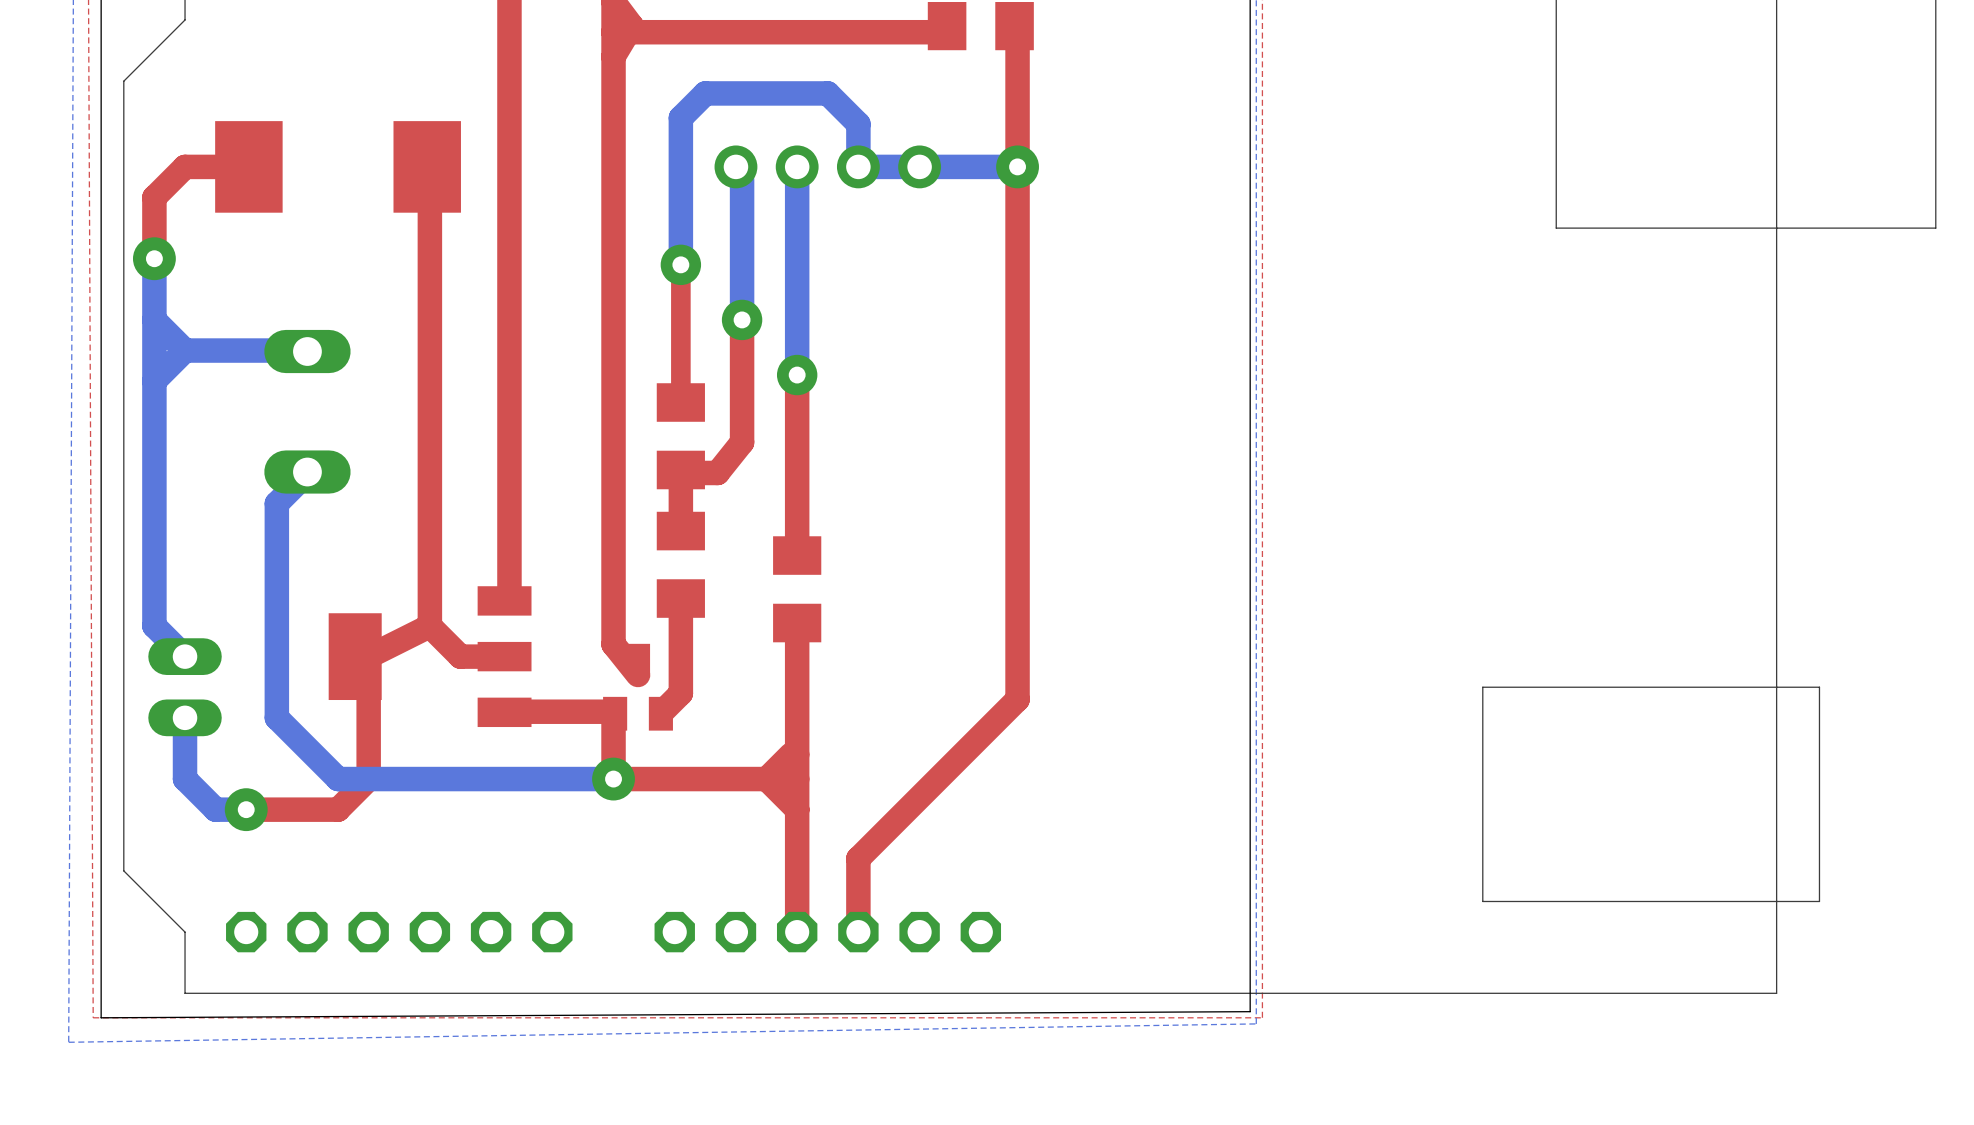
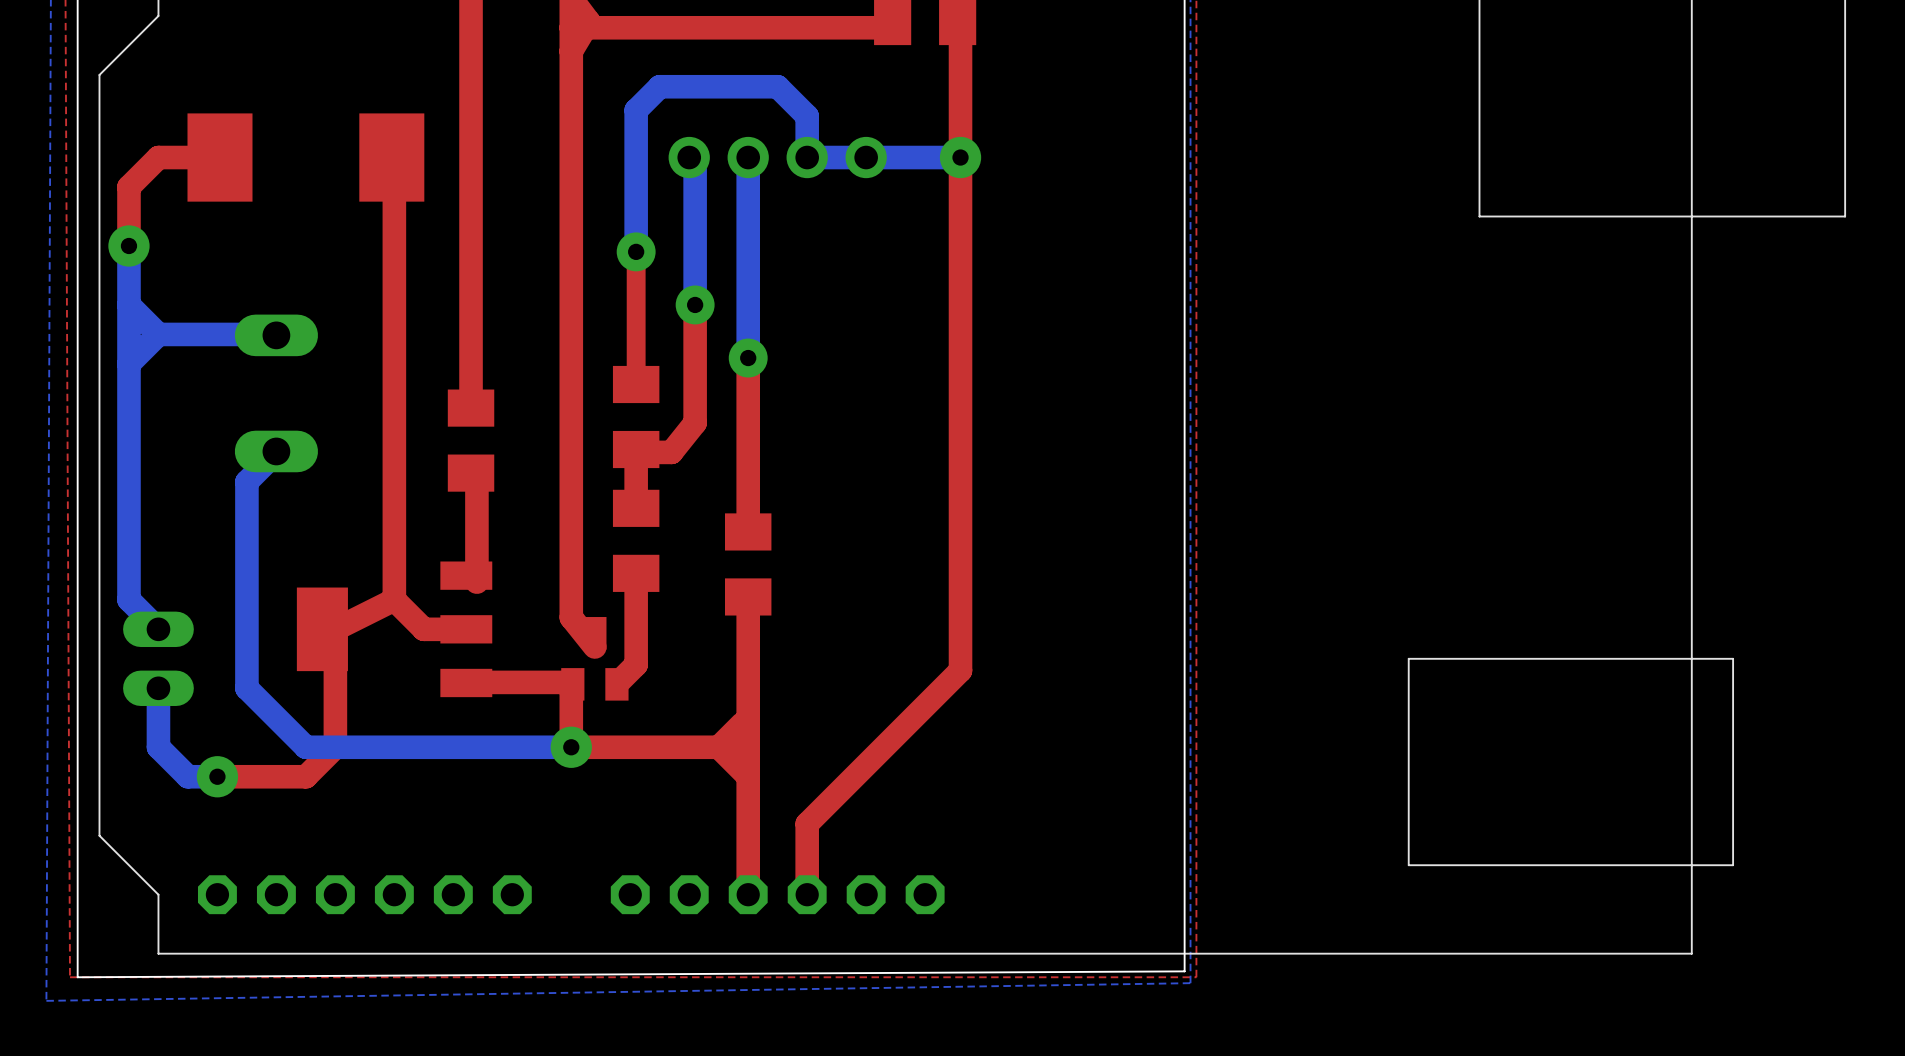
top track: (509, 430) (509, 601) -> none
part: none -> (471, 440)
top track: none -> (476, 475) (476, 582)

